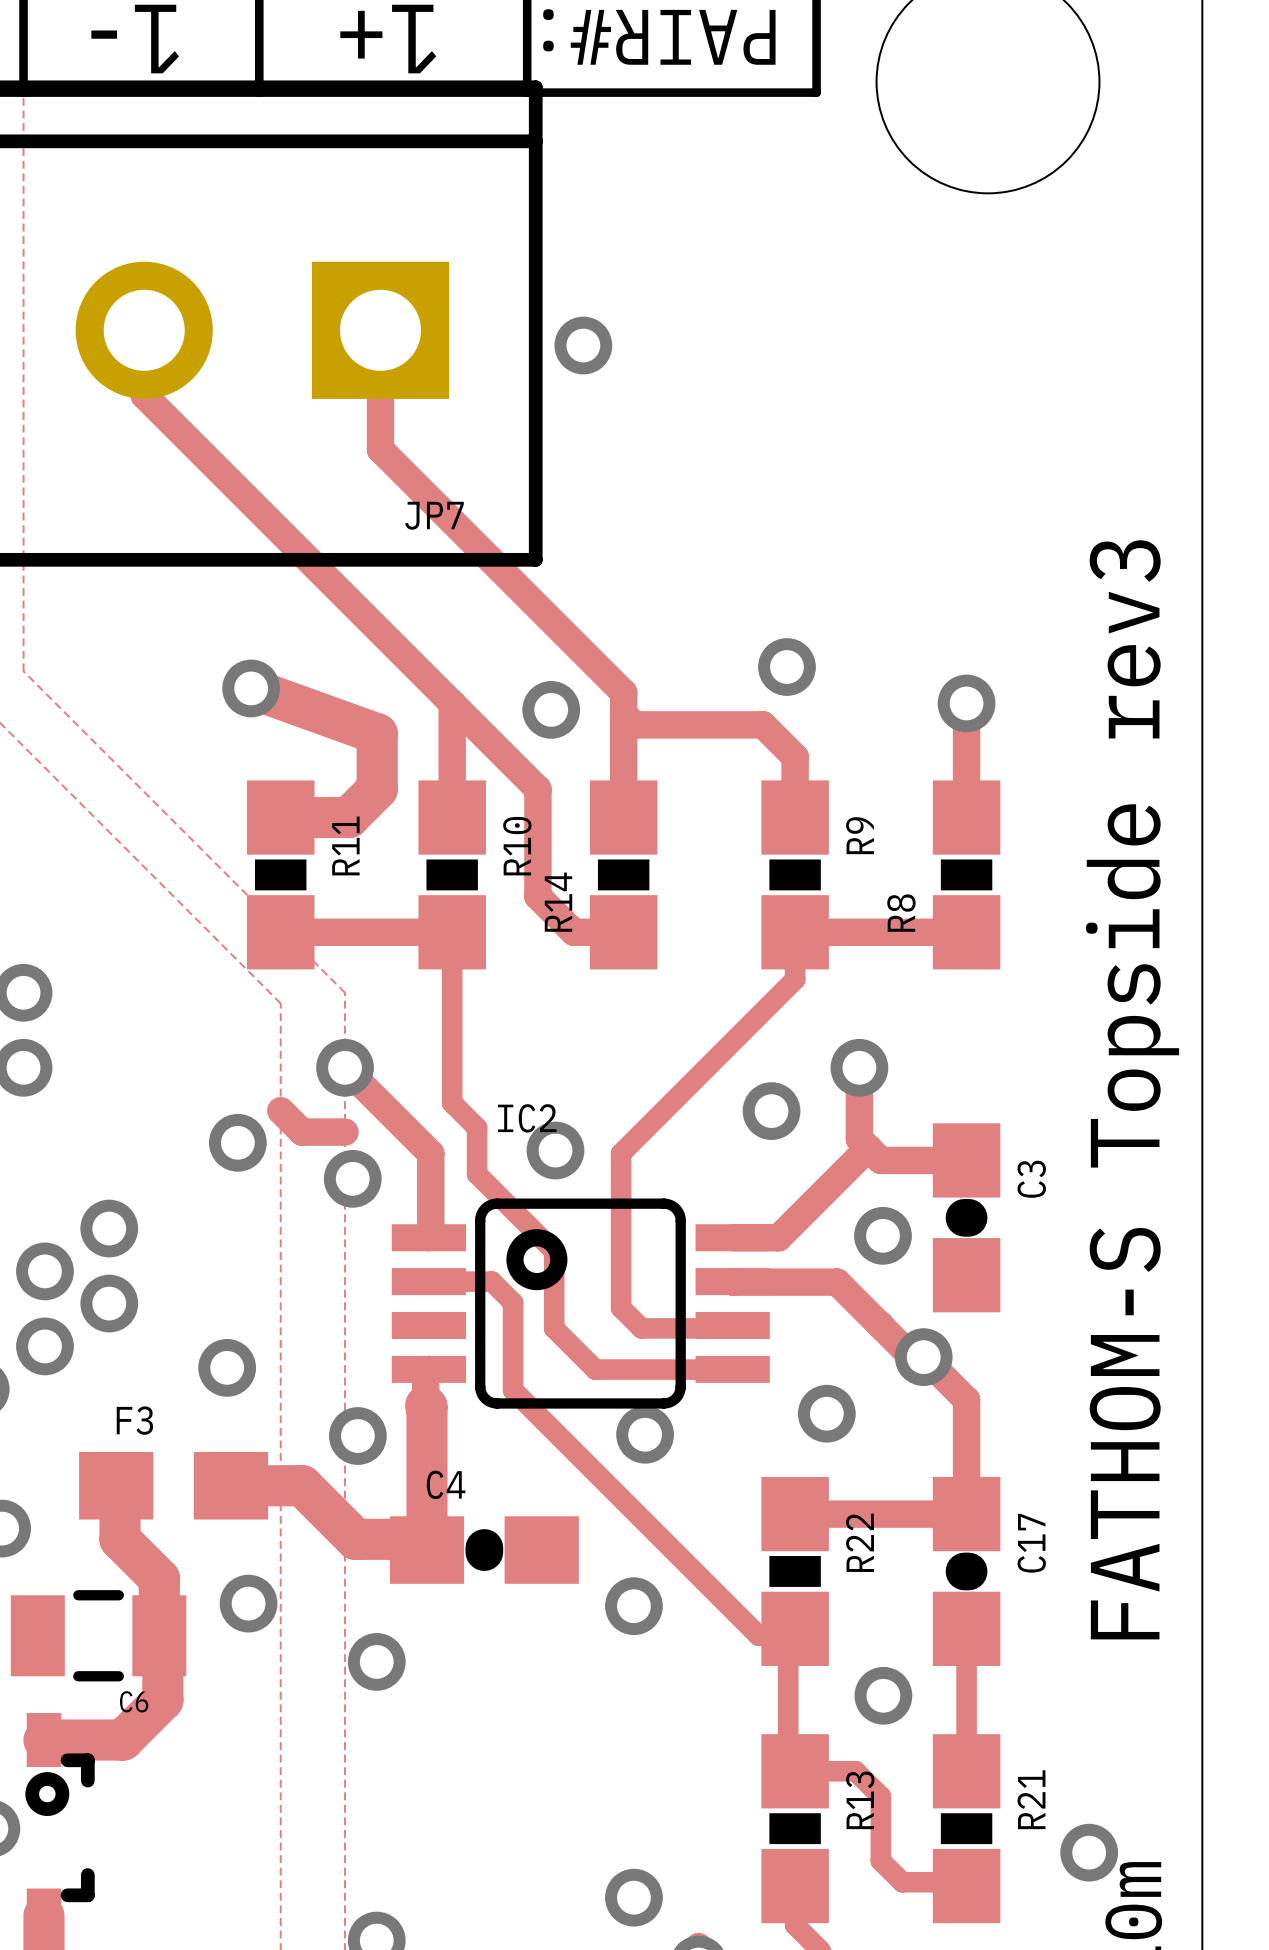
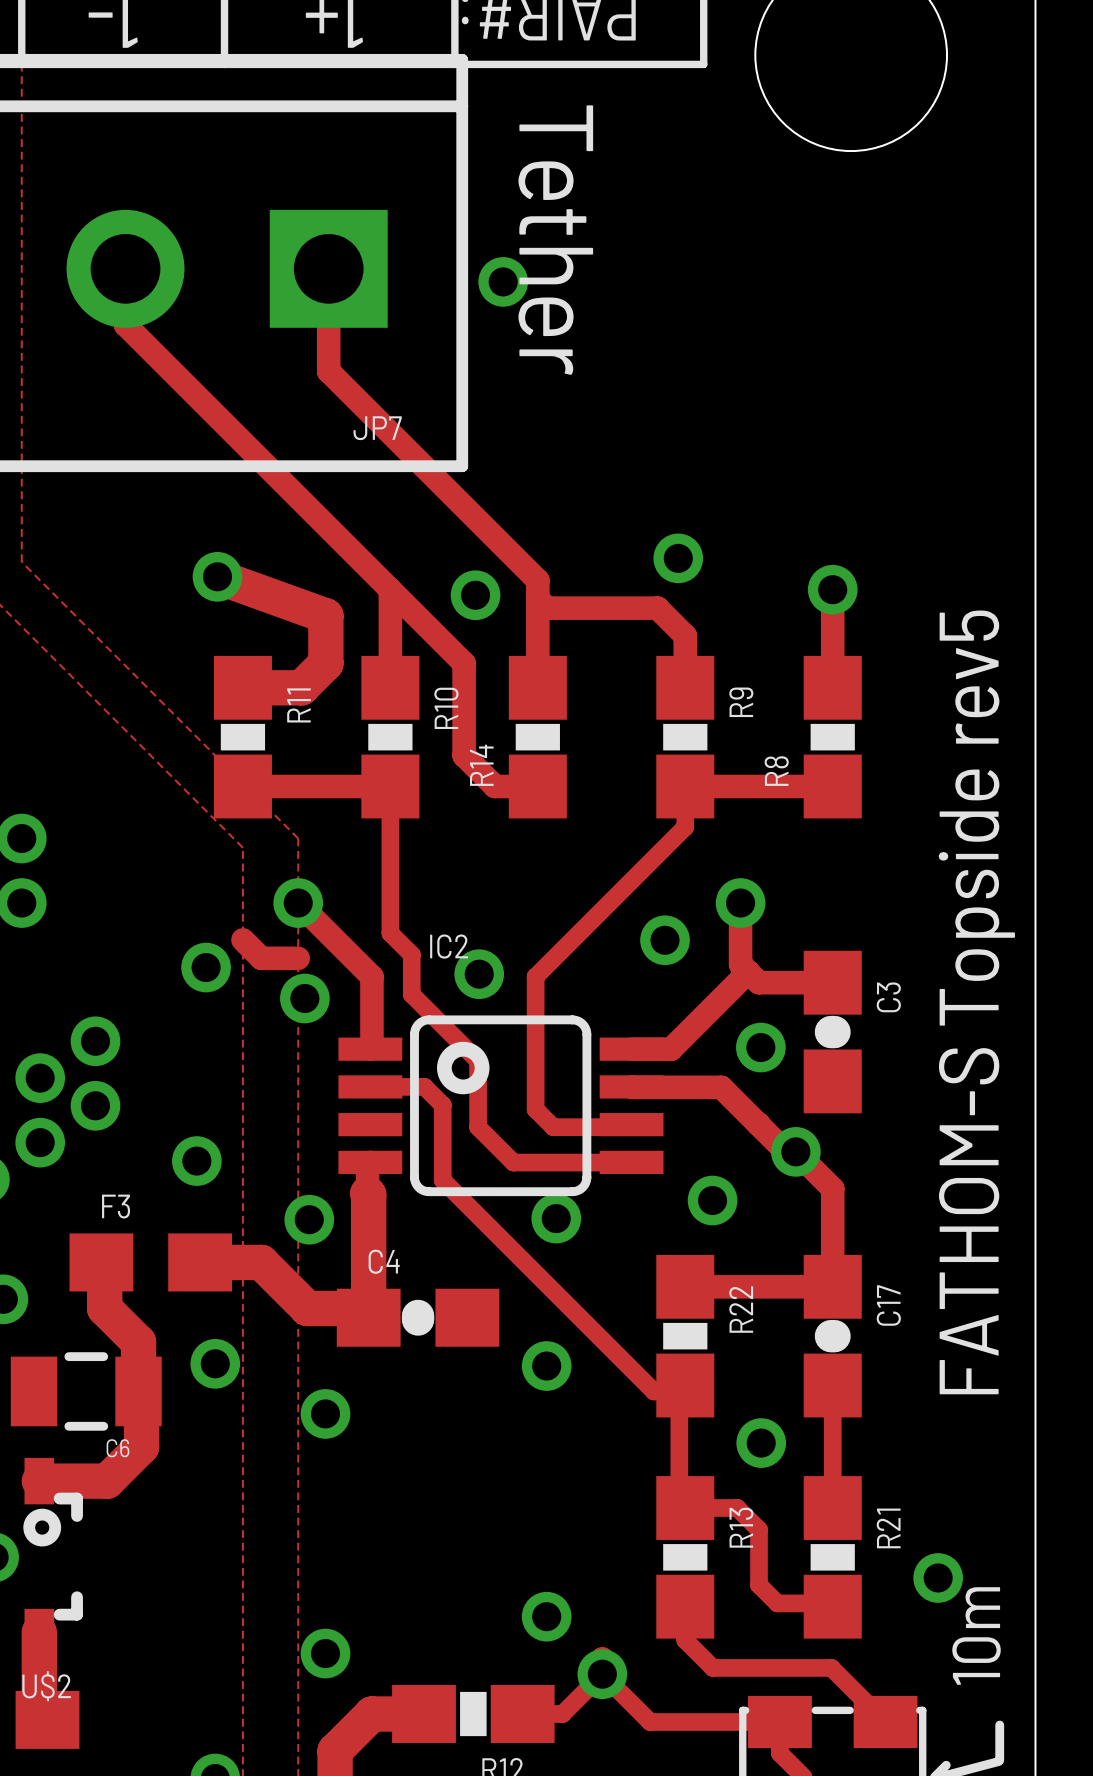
text: none -> Tether (555, 240)
text: FATHOM-S Topside rev3 (1132, 1089) -> FATHOM-S Topside rev5 (976, 1002)

